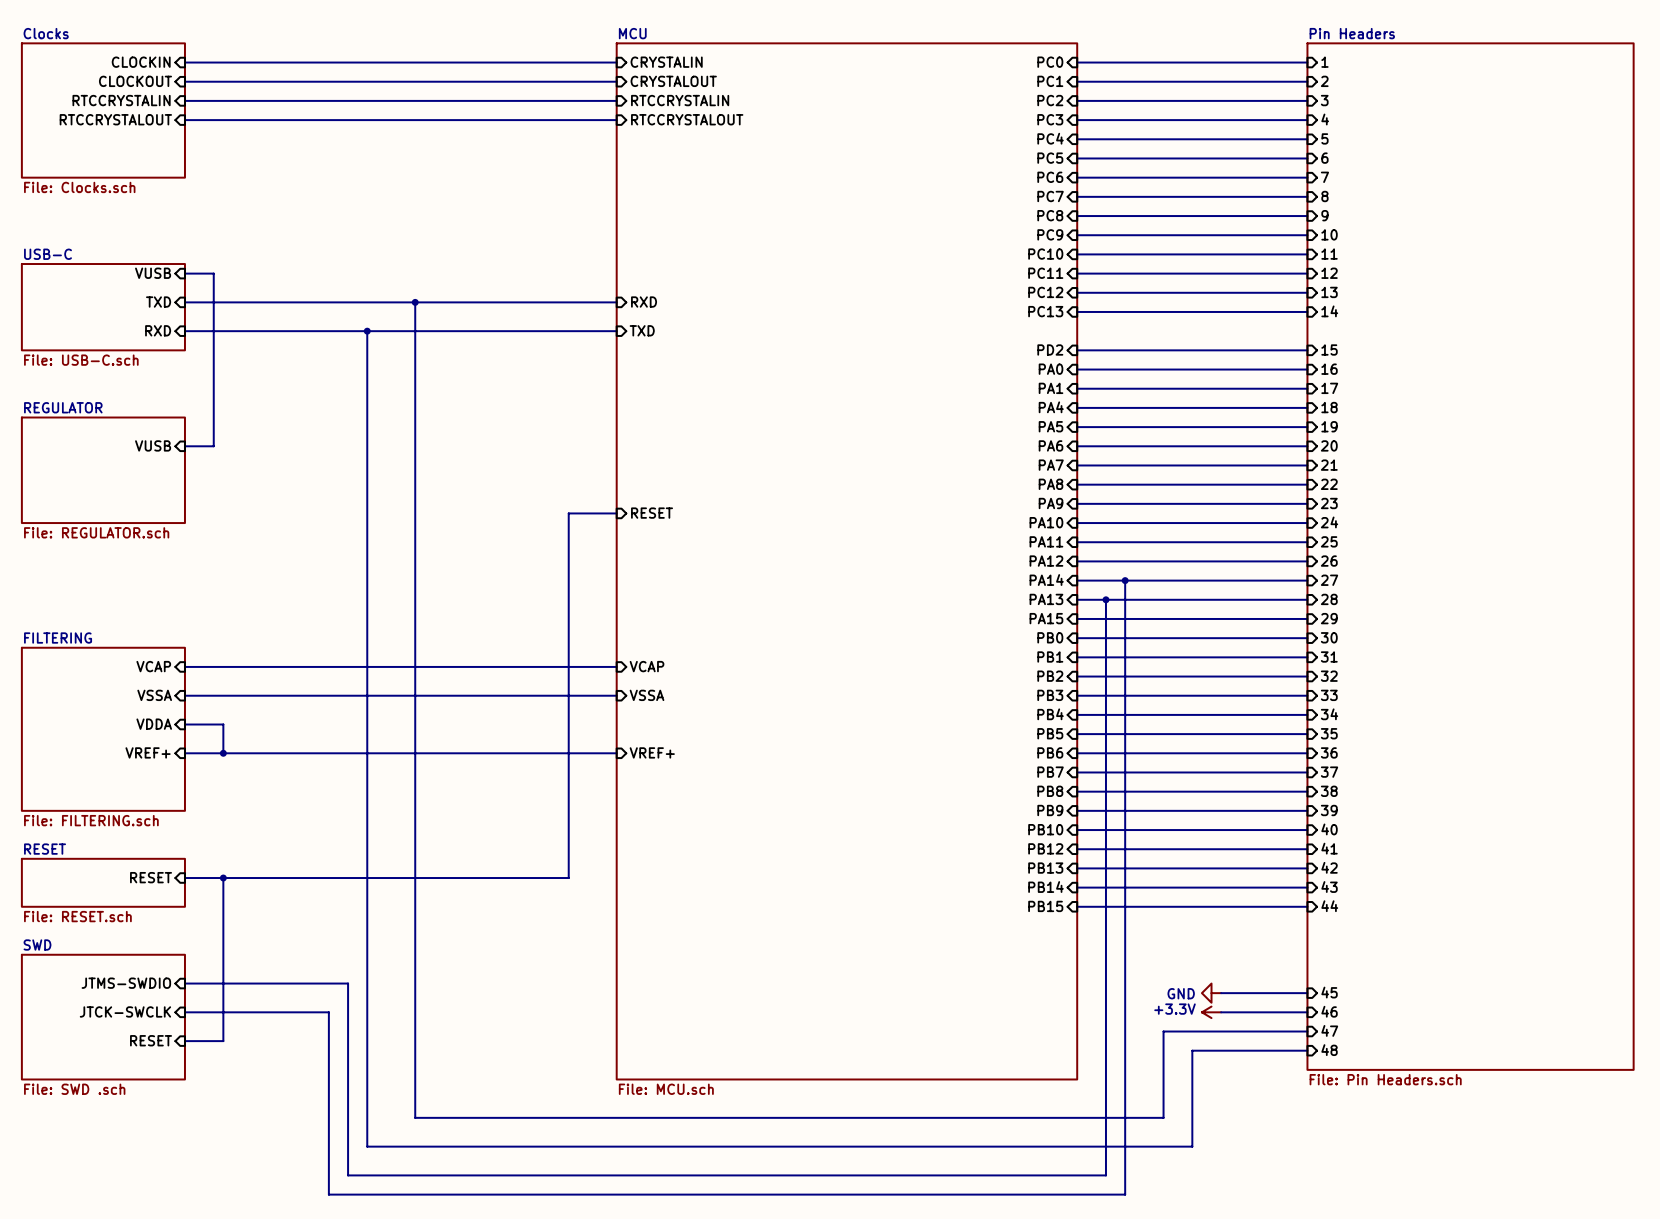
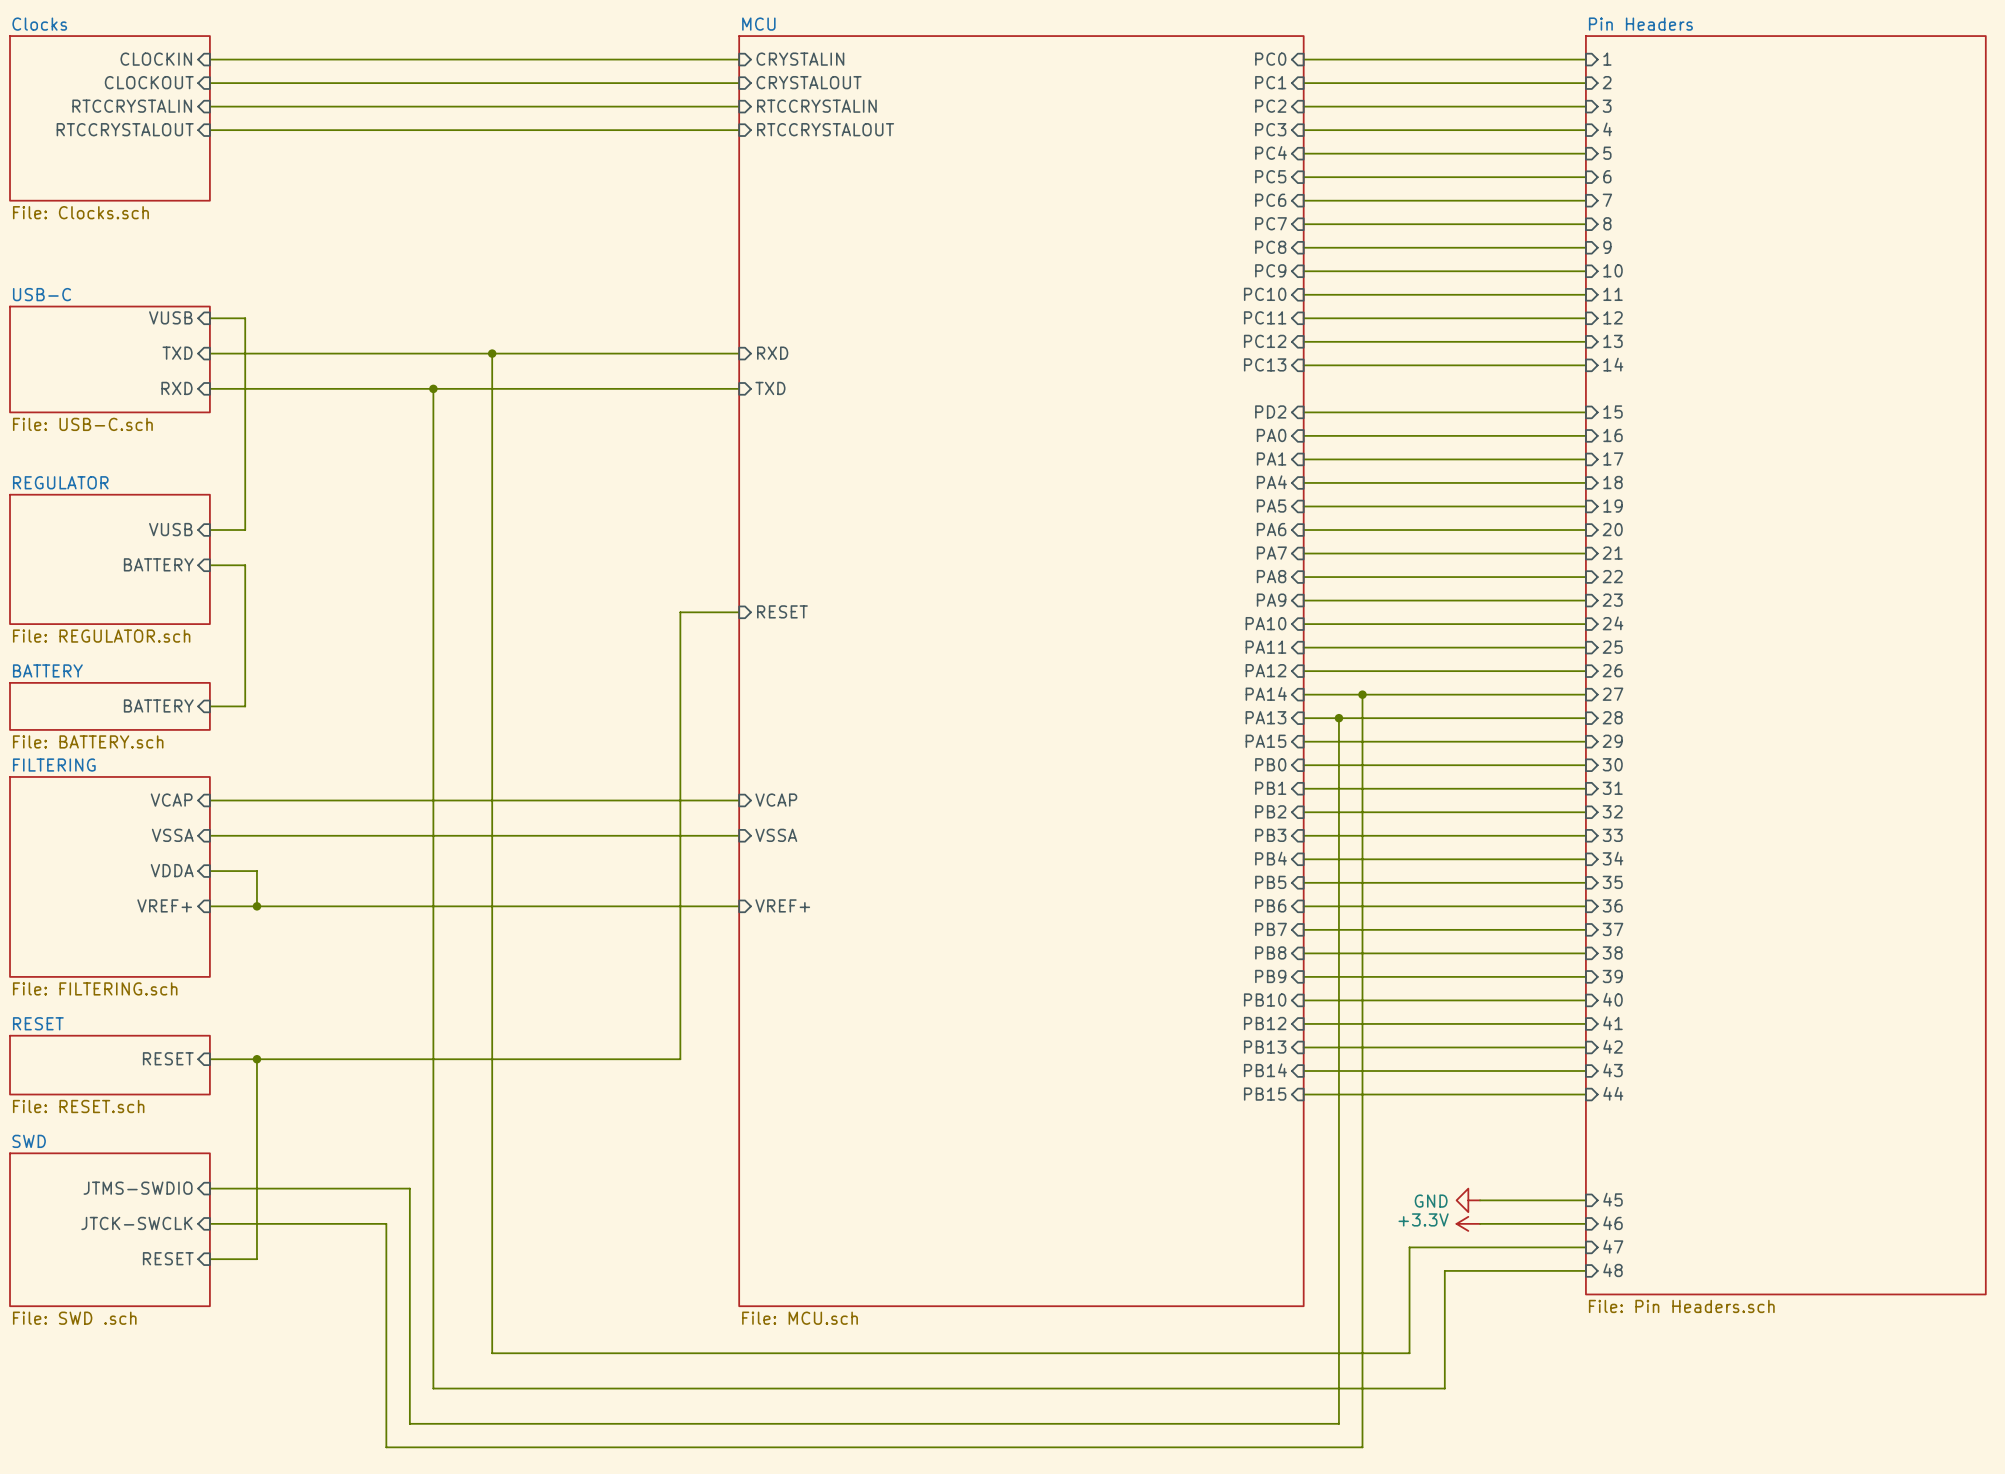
sheet pin: none -> BATTERY (158, 564)
wire: none -> (209, 565) (245, 565) (245, 706) (209, 706)
sheet pin: none -> BATTERY (158, 705)
sheet BATTERY: none -> File: BATTERY.sch (109, 706)

